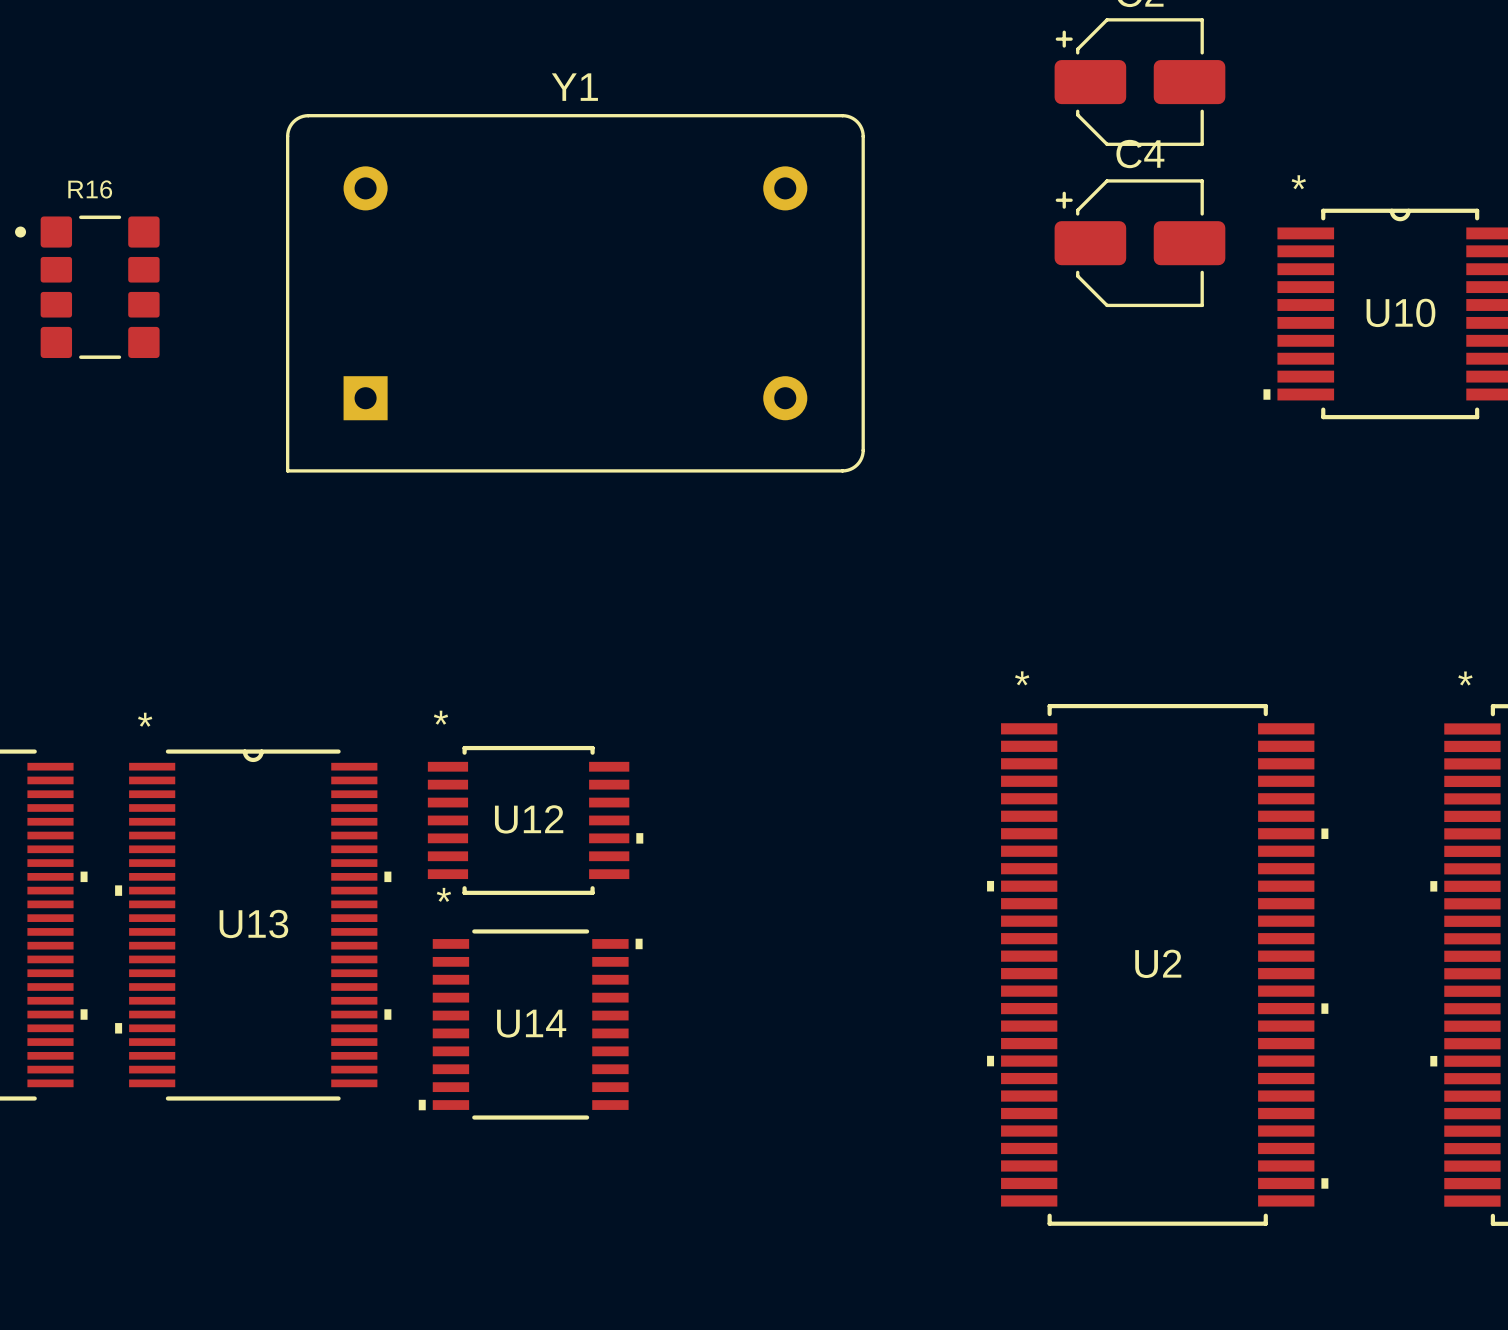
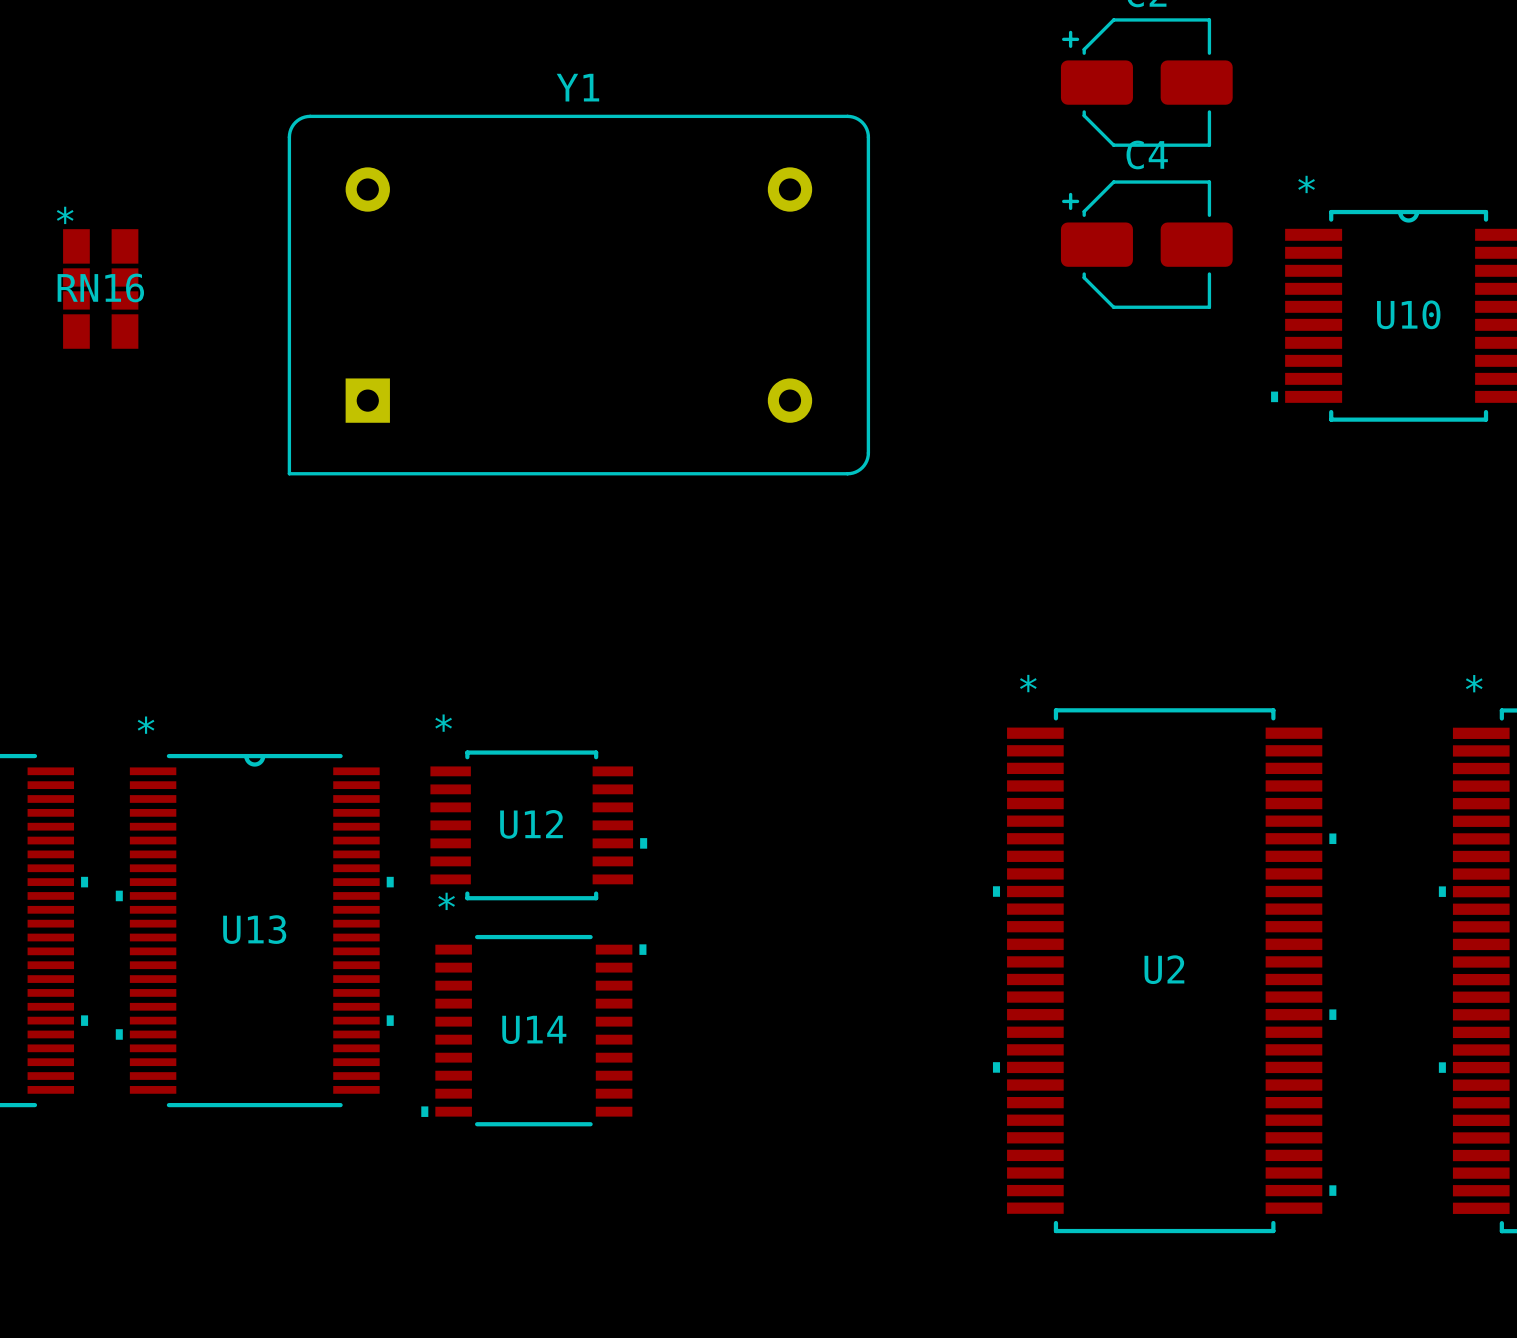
R16: (87, 287) -> none
RN16: none -> (100, 288)

